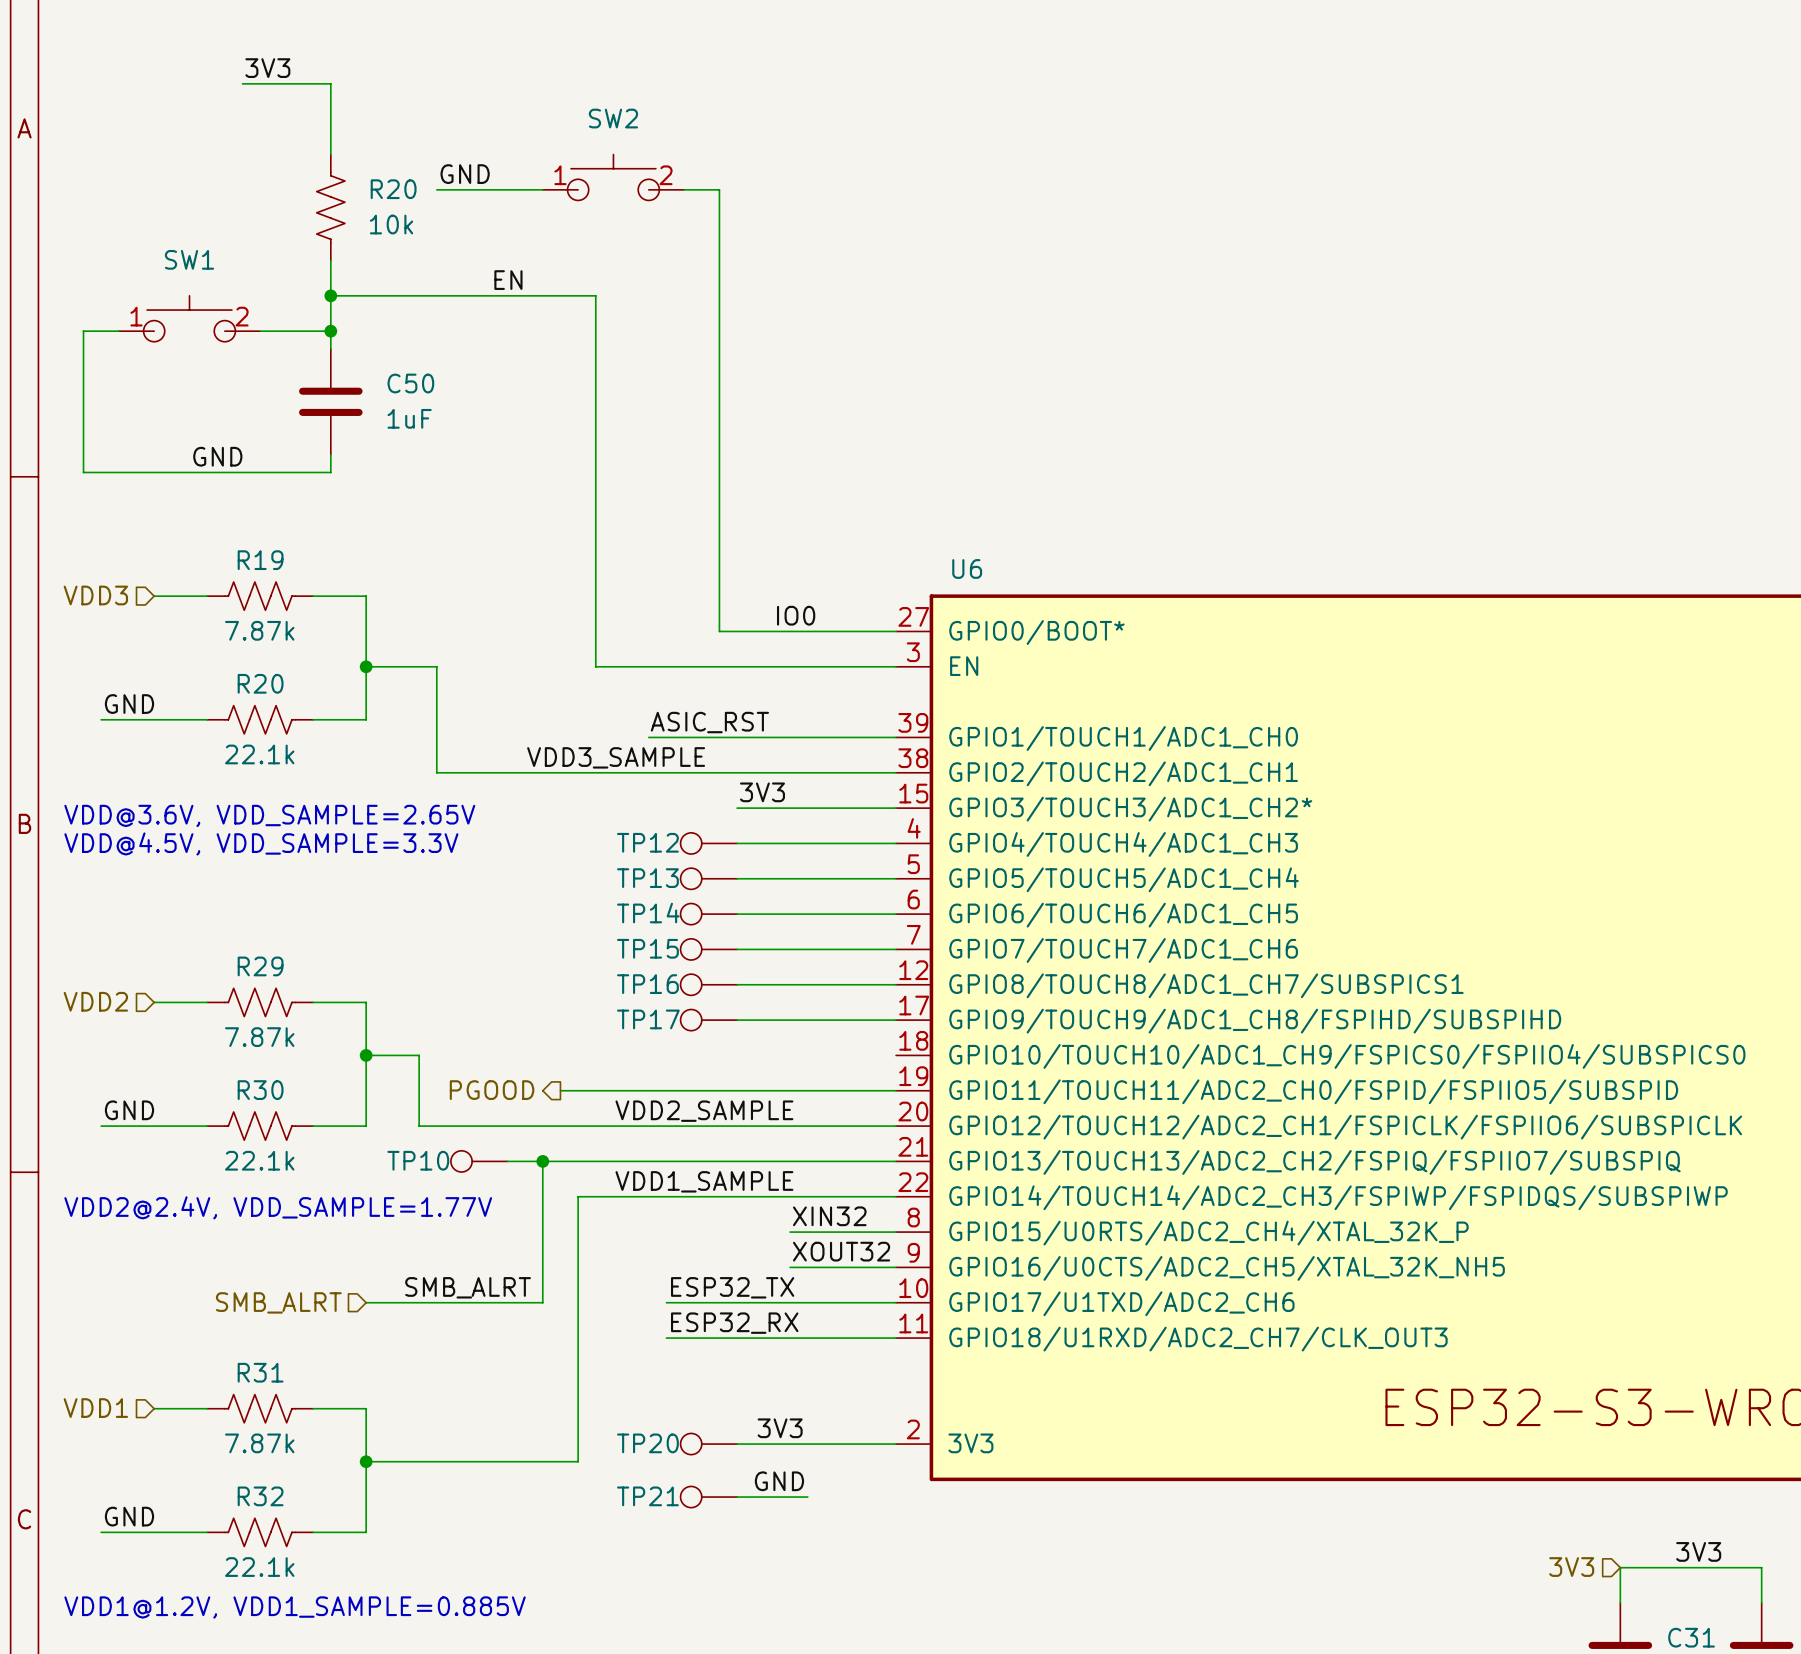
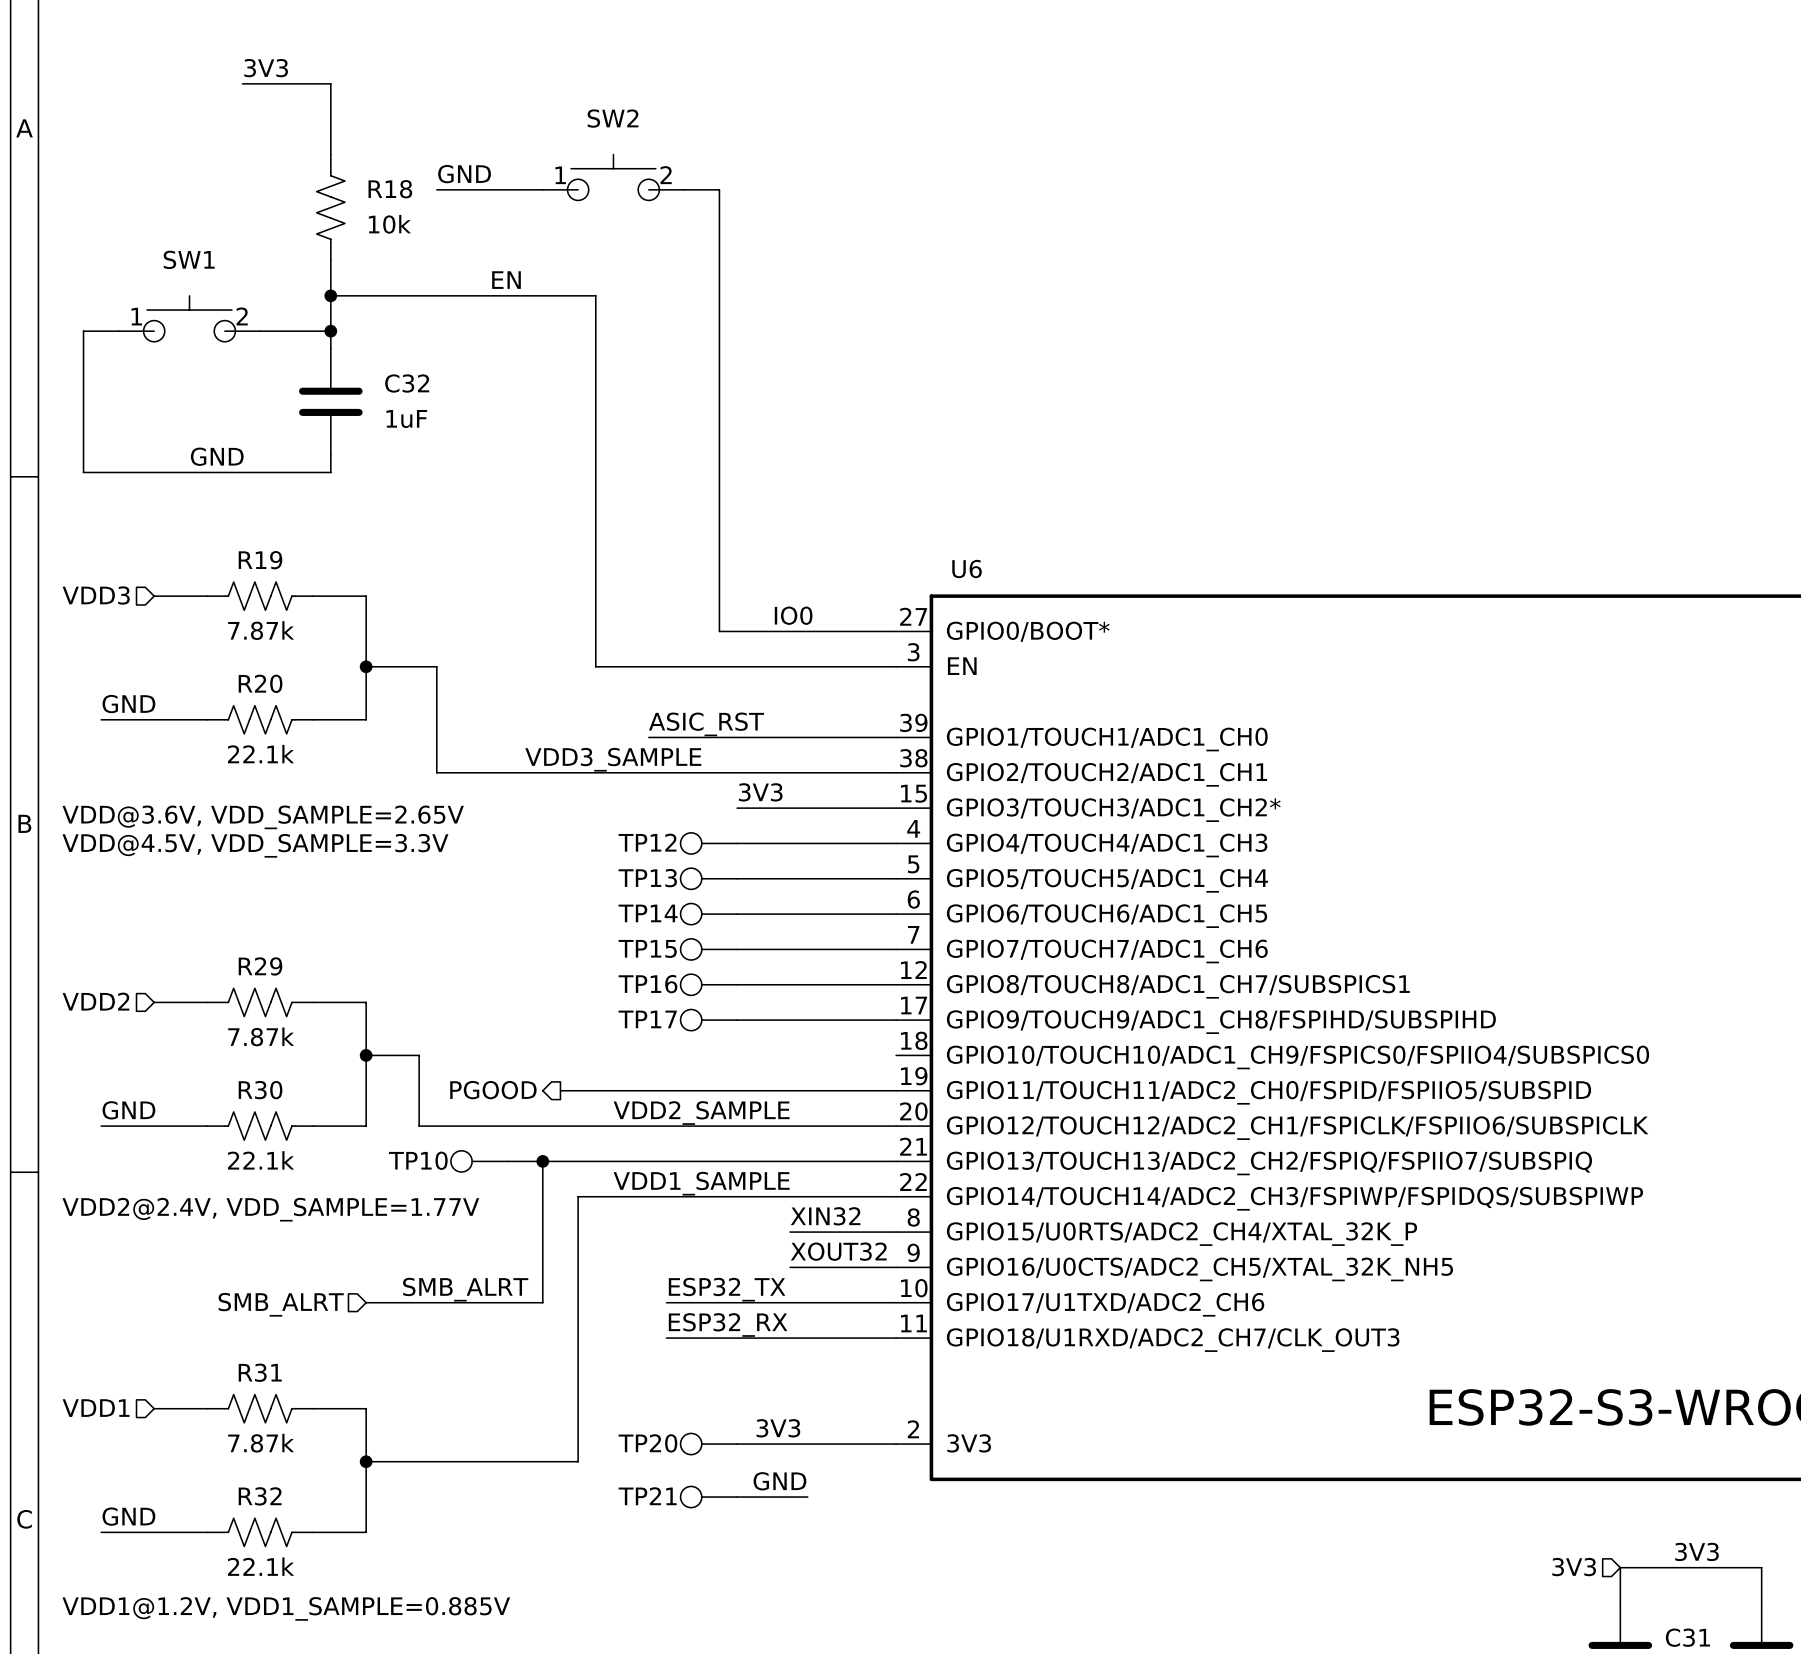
R20 name: R20 (393, 189) -> R18 (390, 189)
C50 name: C50 (410, 383) -> C32 (407, 383)

